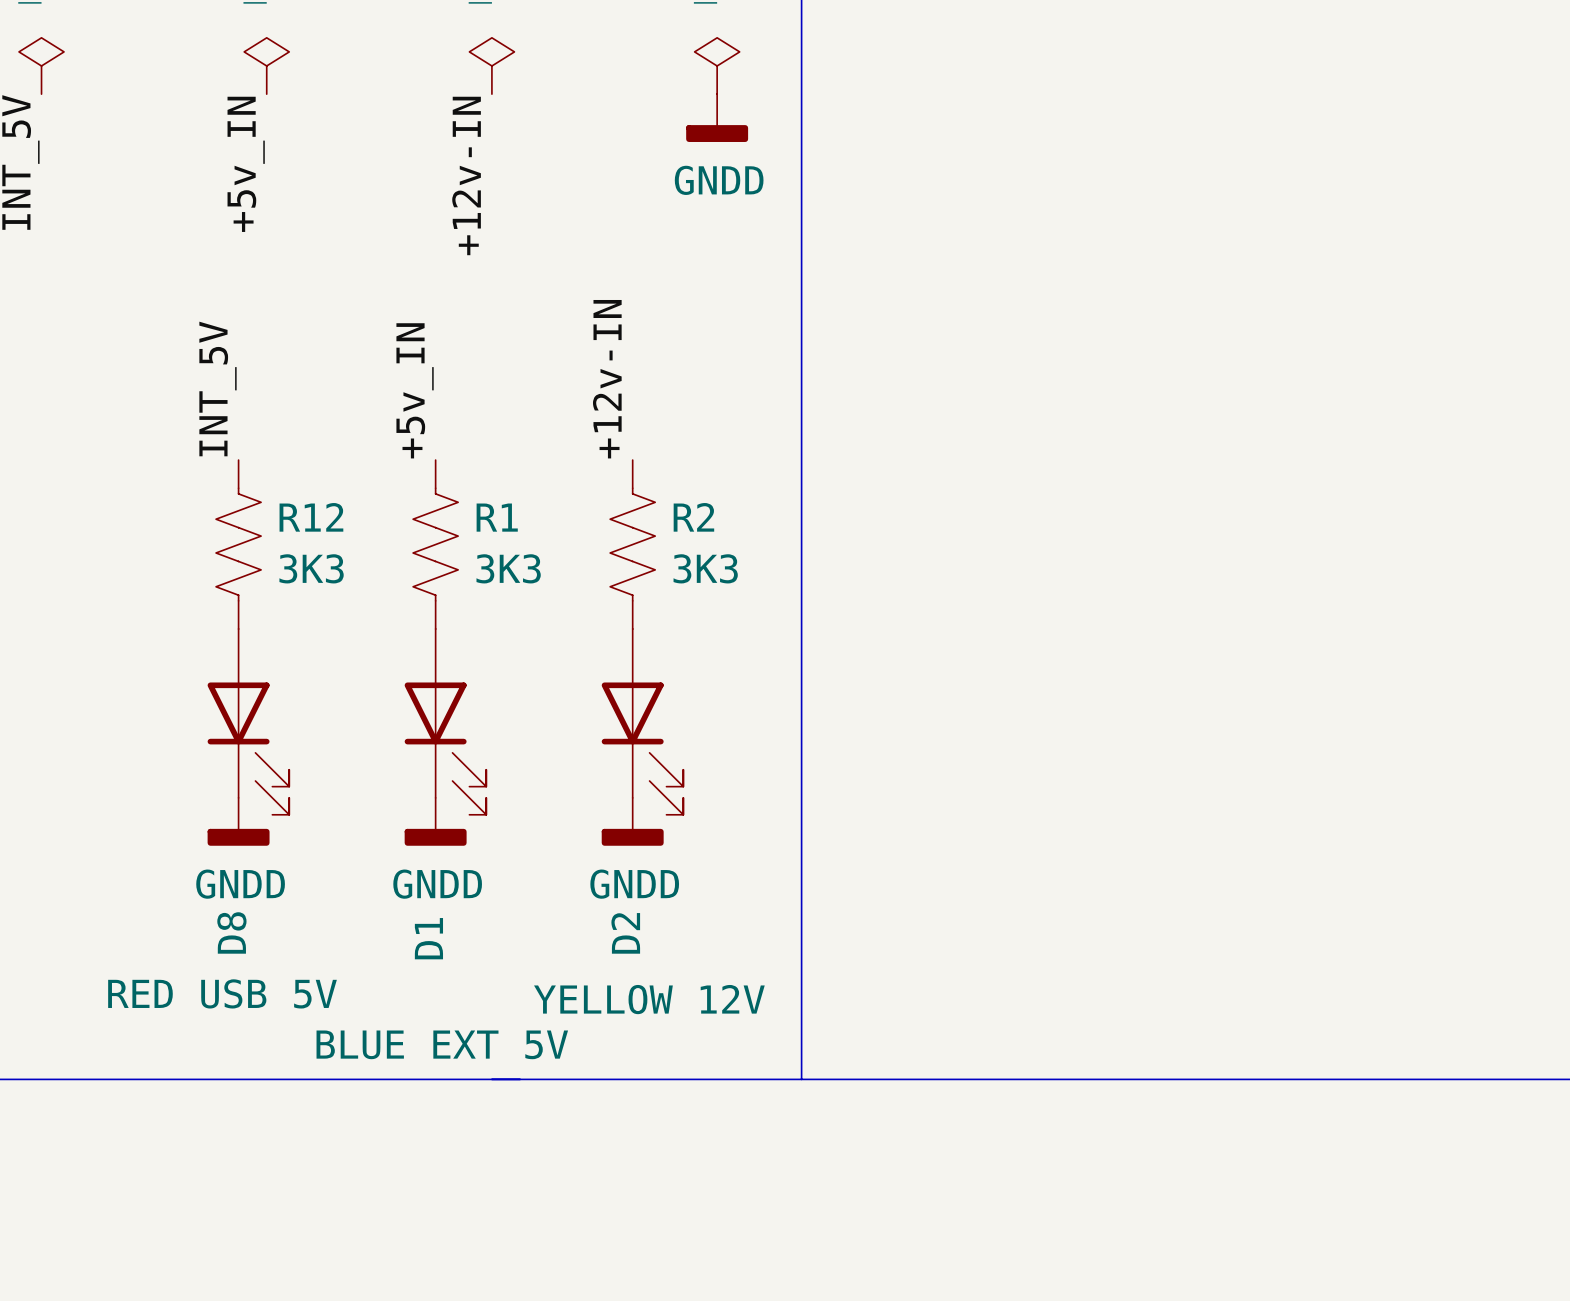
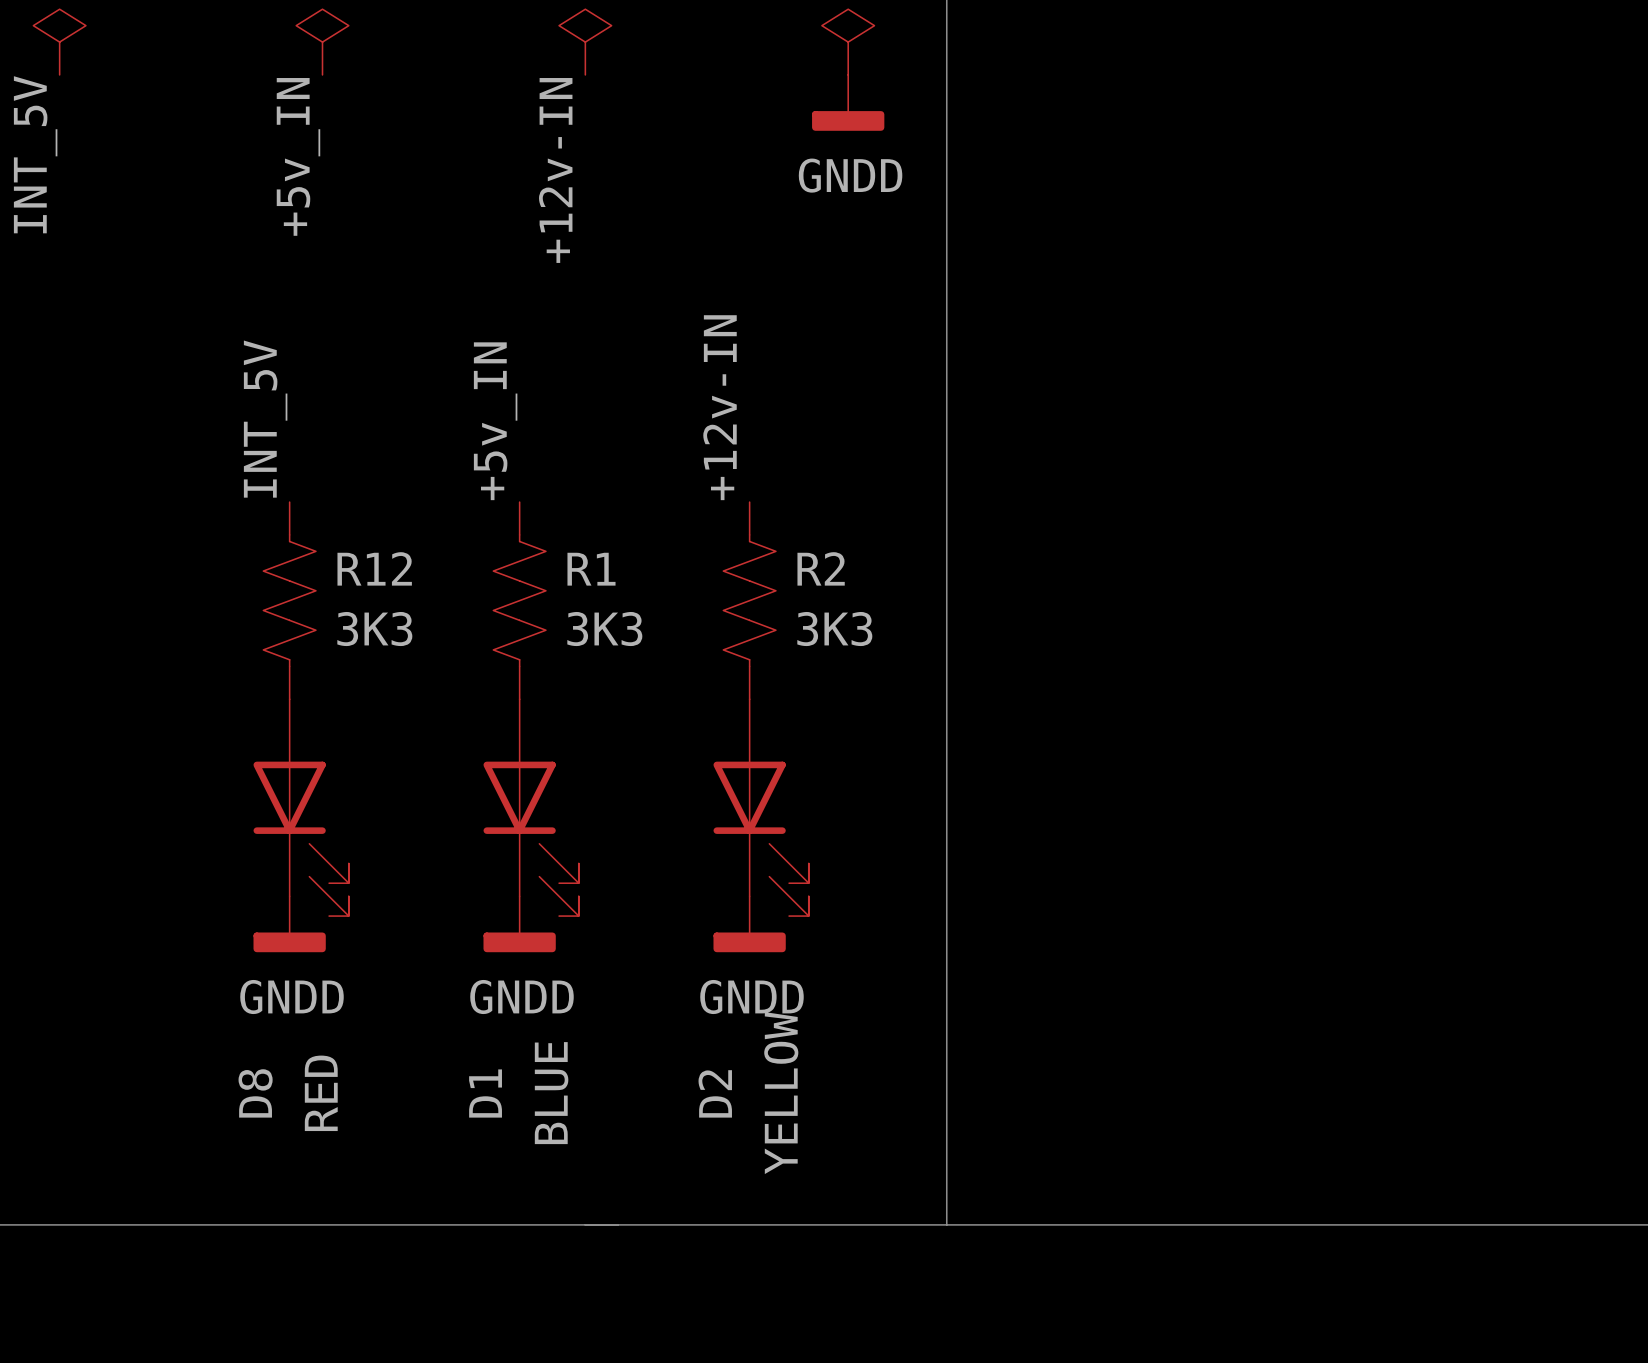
D8 name position: D8 (231, 932) -> D8 (255, 1093)
D2 name position: D2 (625, 933) -> D2 (715, 1093)
D1 name position: D1 (428, 938) -> D1 (485, 1093)
D8 value: RED USB 5V (222, 993) -> RED (321, 1093)
D2 value: YELLOW 12V (649, 999) -> YELLOW (781, 1093)
D1 value: BLUE EXT 5V (442, 1044) -> BLUE (551, 1093)

